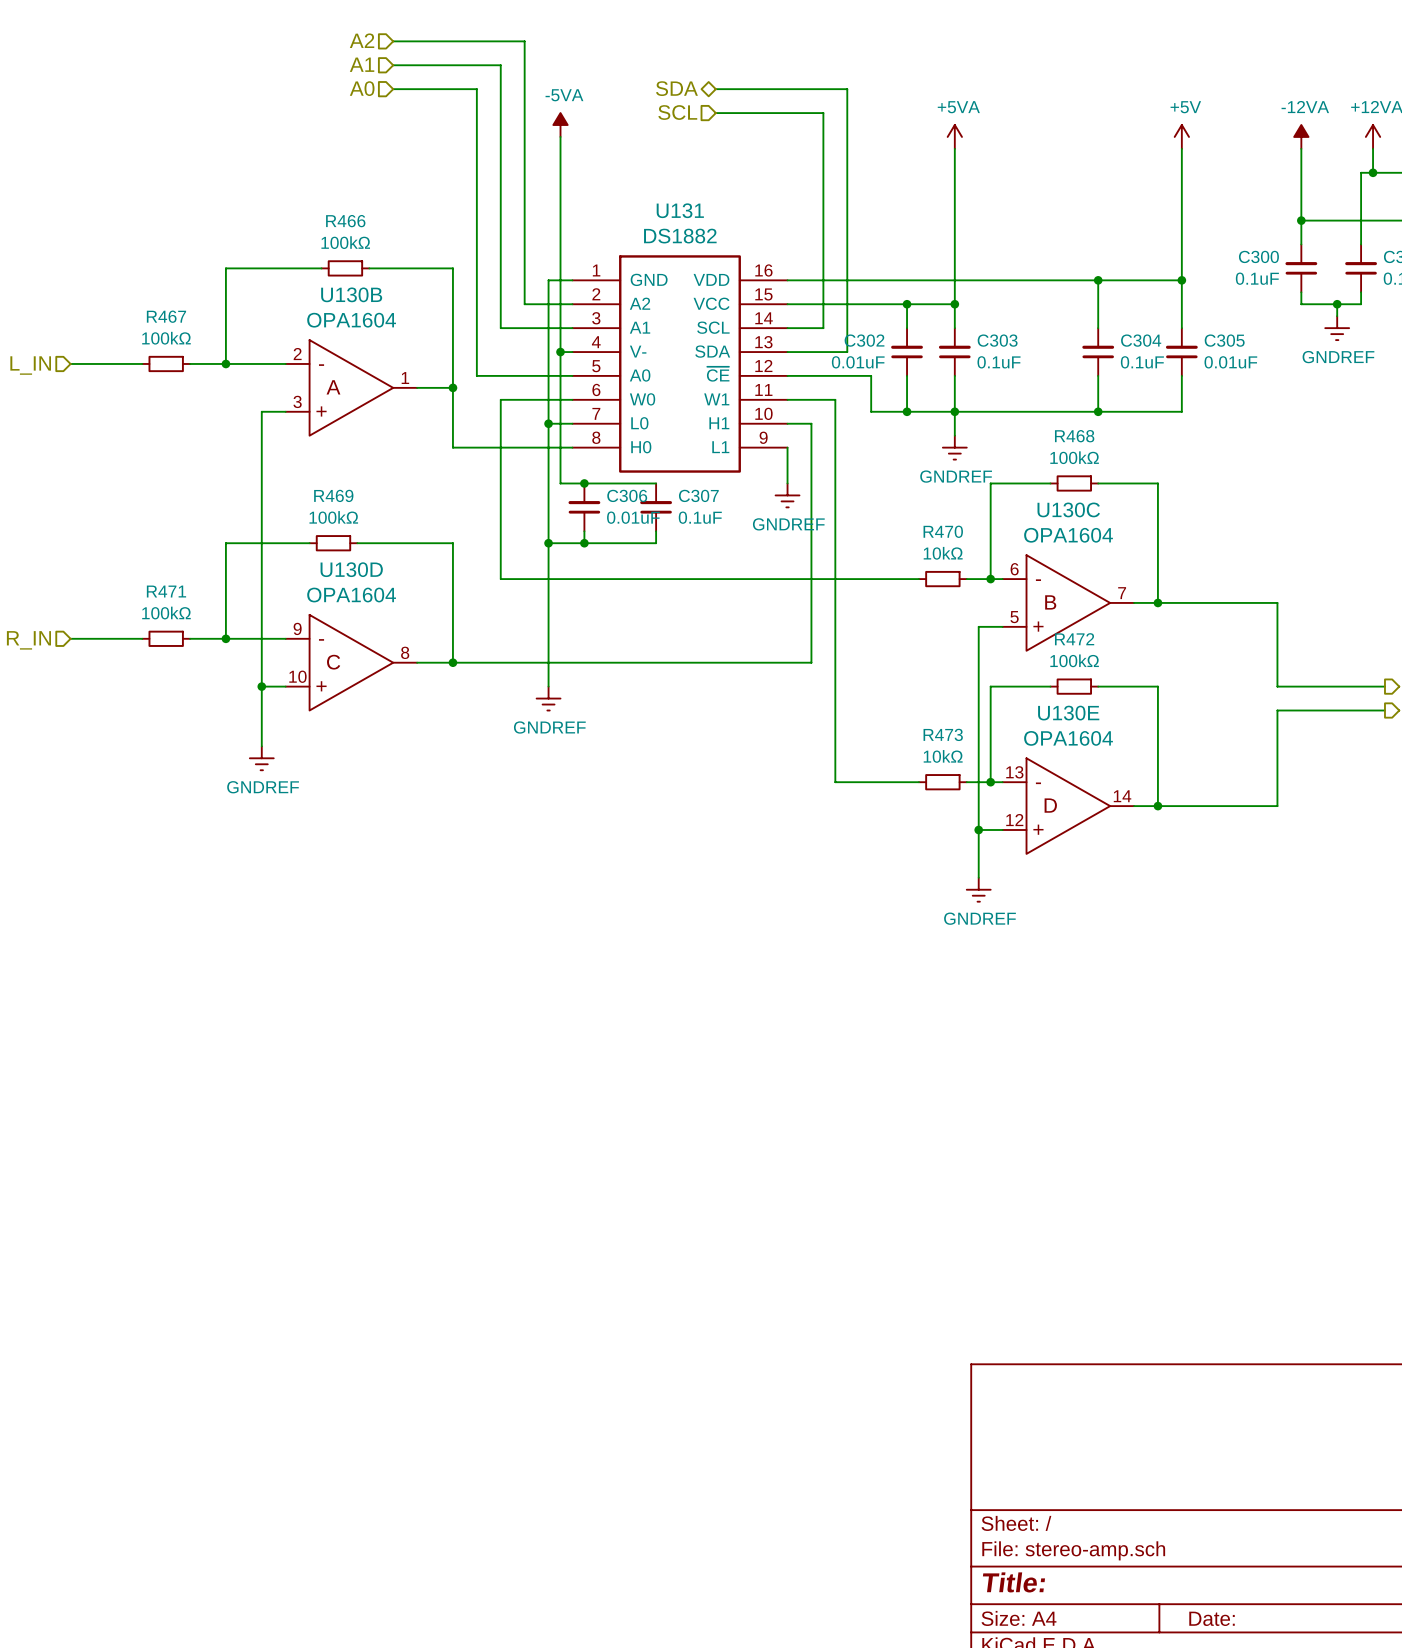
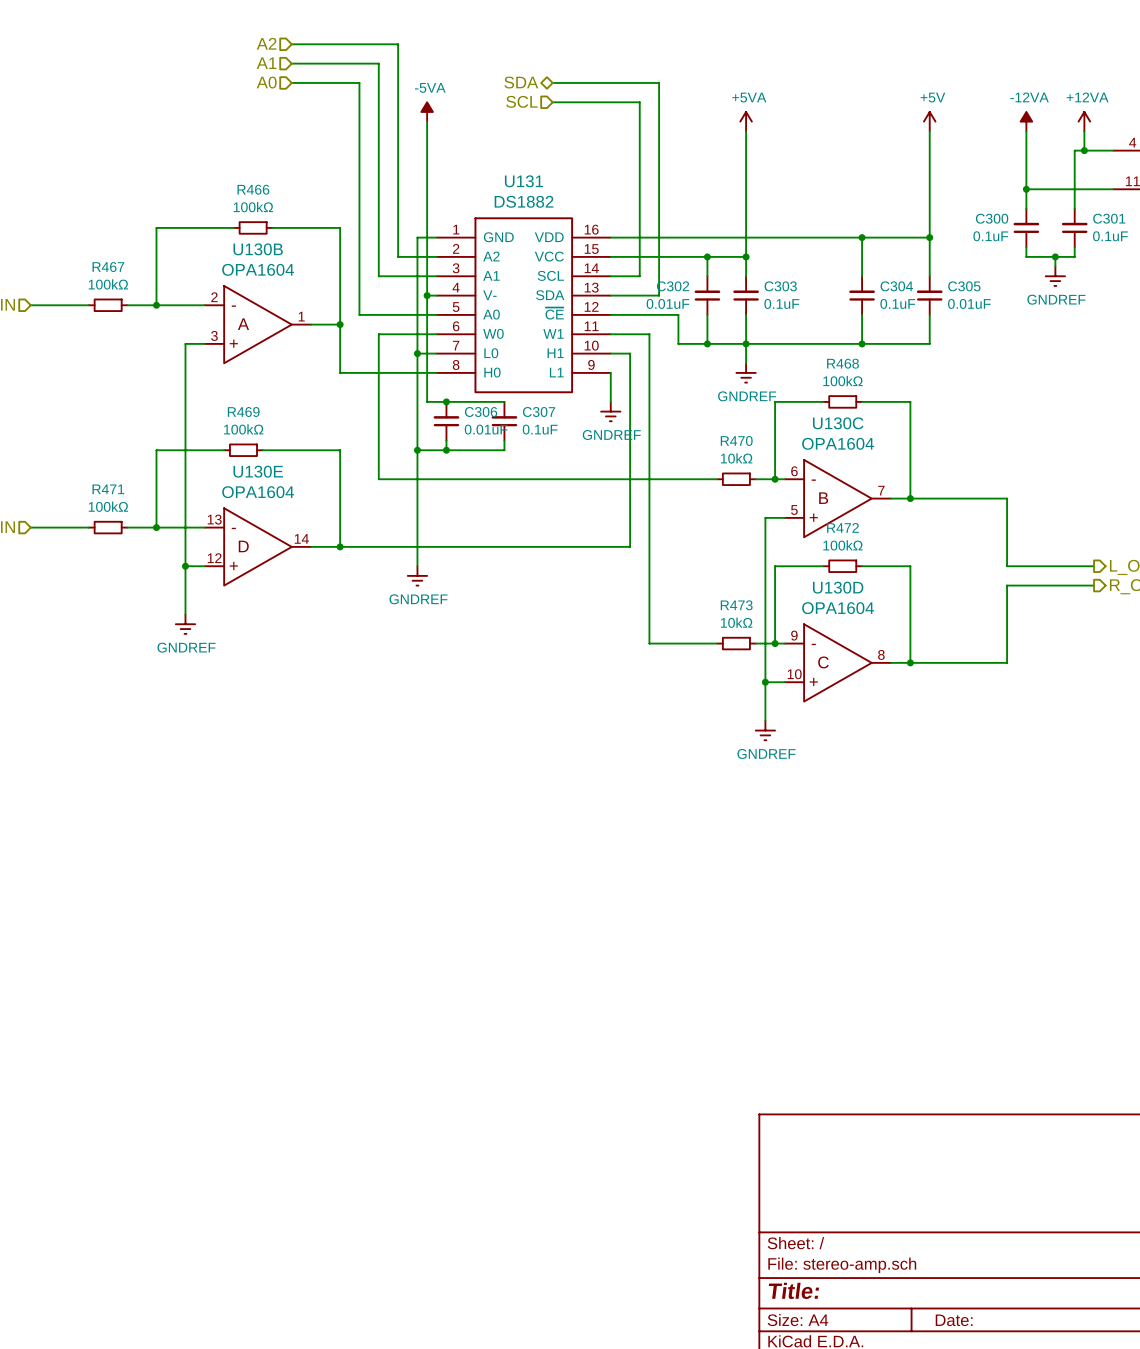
U130D position: (351, 662) -> (837, 662)
U130E position: (1068, 806) -> (257, 546)

